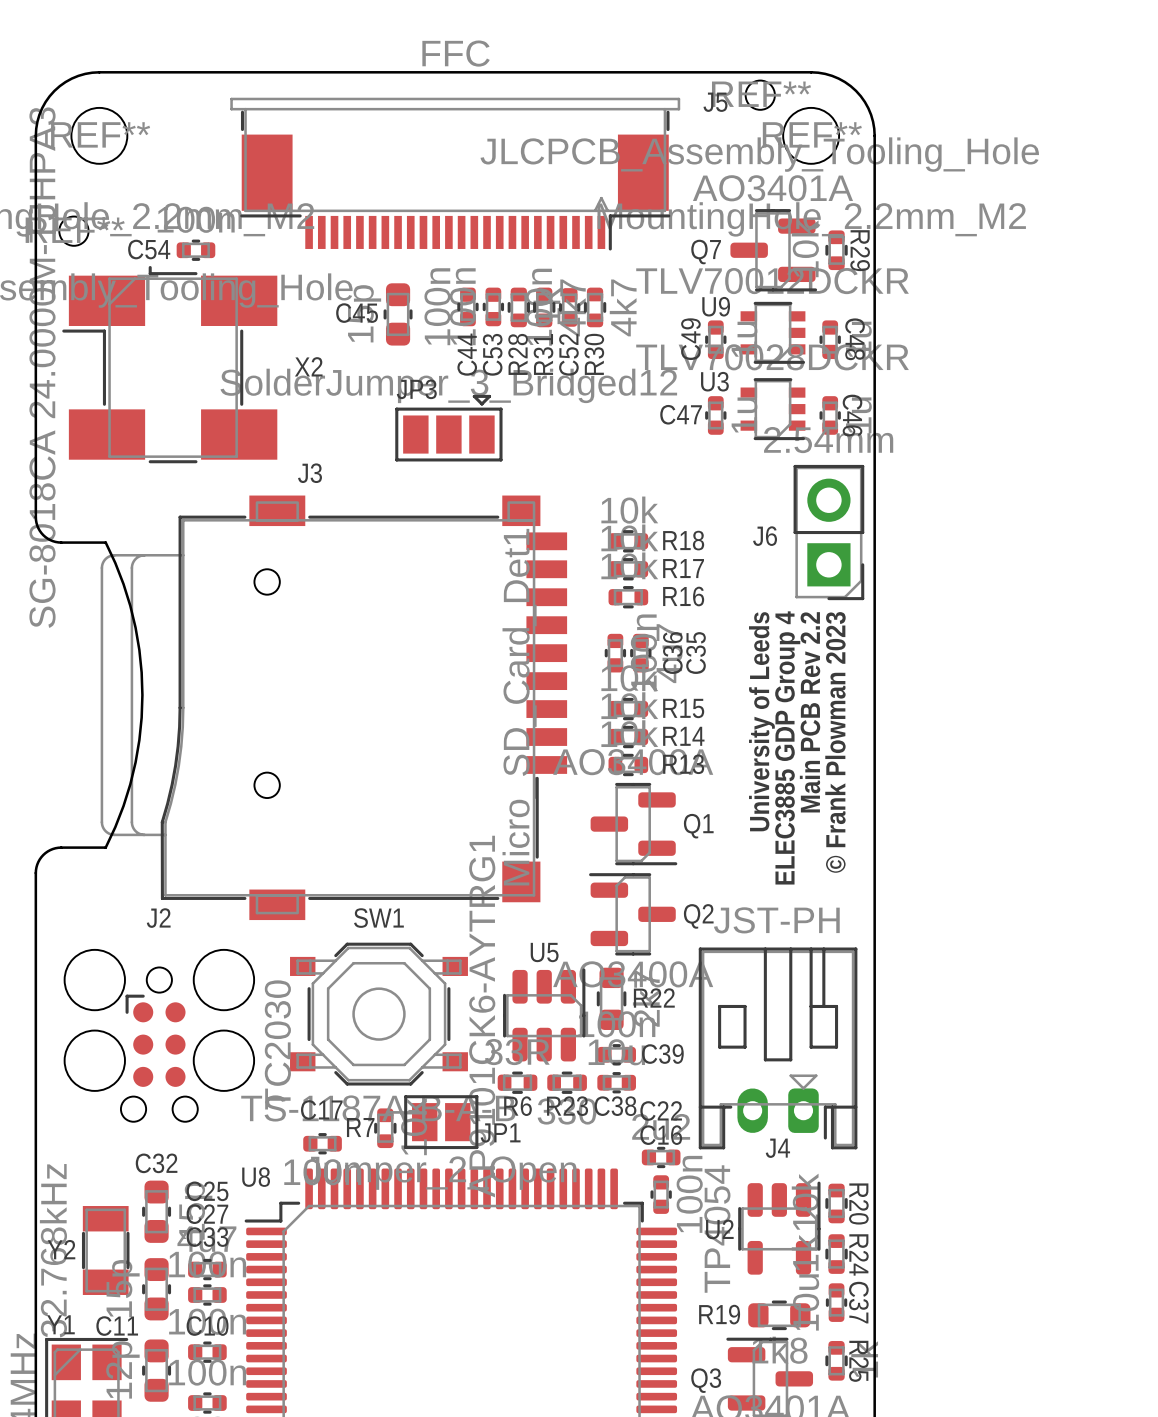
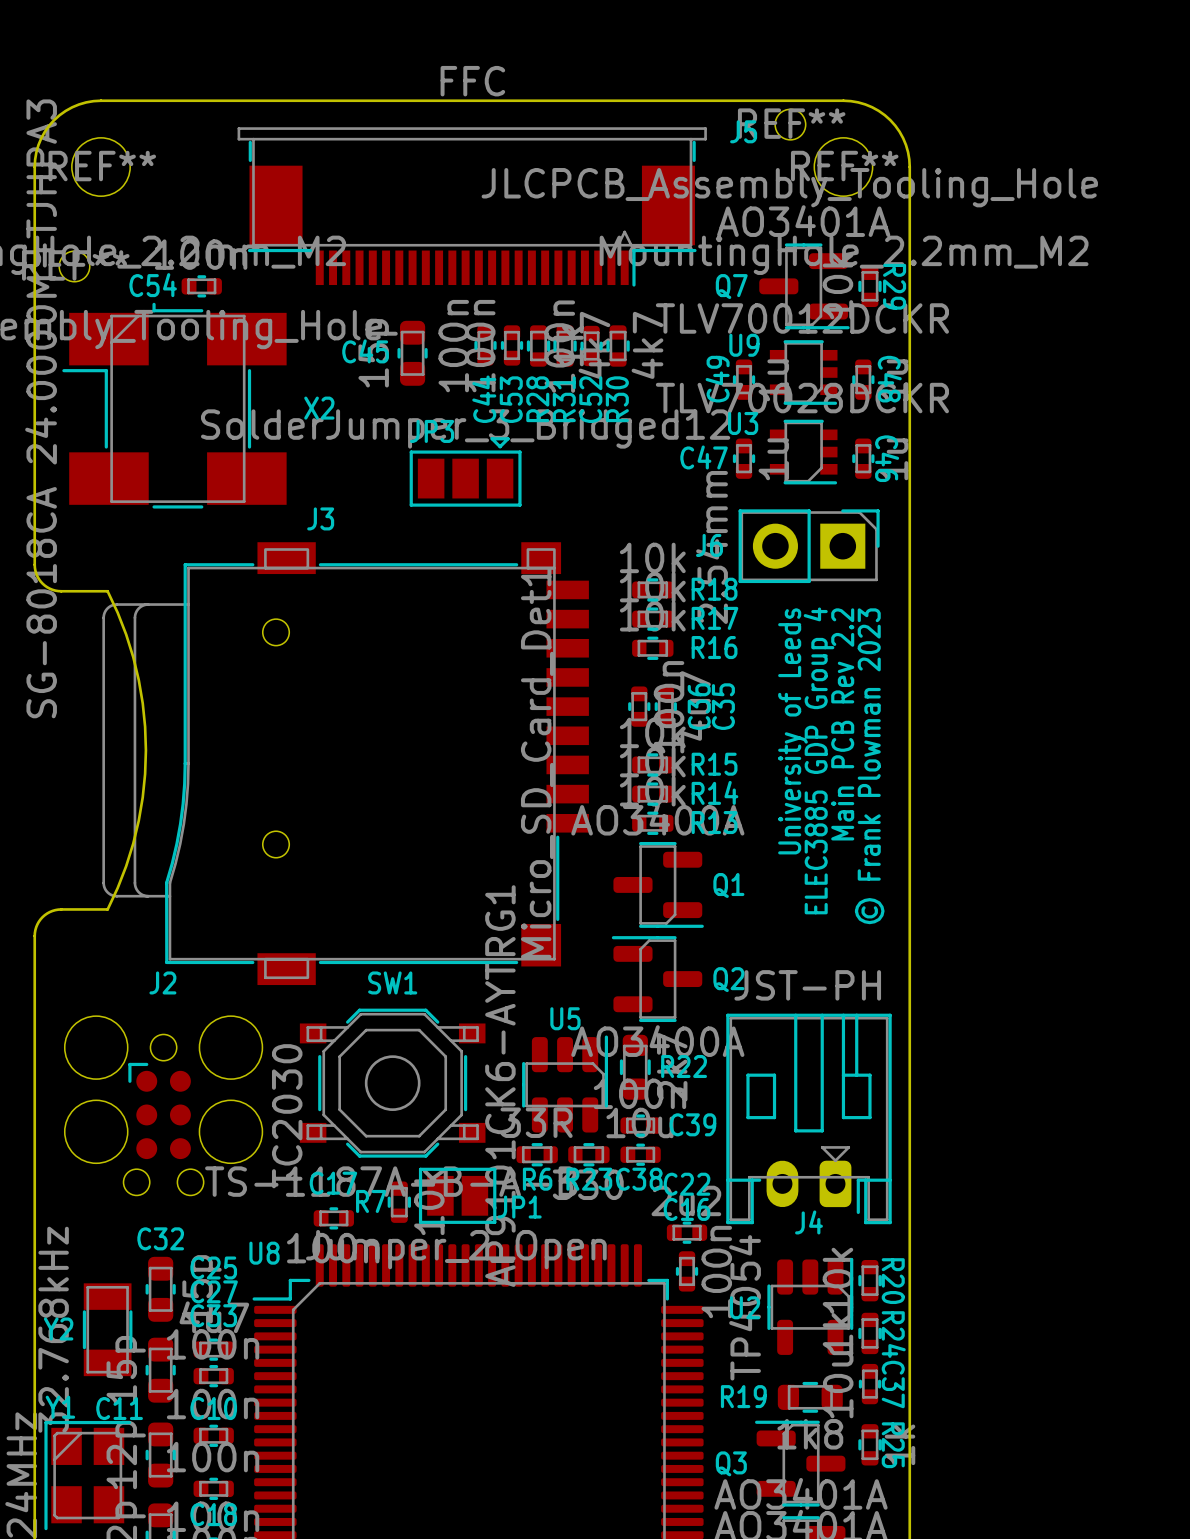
J6 rotation: 0° (828, 532) -> 90° counterclockwise (809, 546)
text position: Main PCB Rev 2.2 (810, 712) -> Main PCB Rev 2.2 (842, 724)
text position: University of Leeds (761, 721) -> University of Leeds (792, 731)
text position: © Frank Plowman 2023 (835, 742) -> © Frank Plowman 2023 (869, 766)
text position: ELEC3885 GDP Group 4 (787, 747) -> ELEC3885 GDP Group 4 (819, 760)

